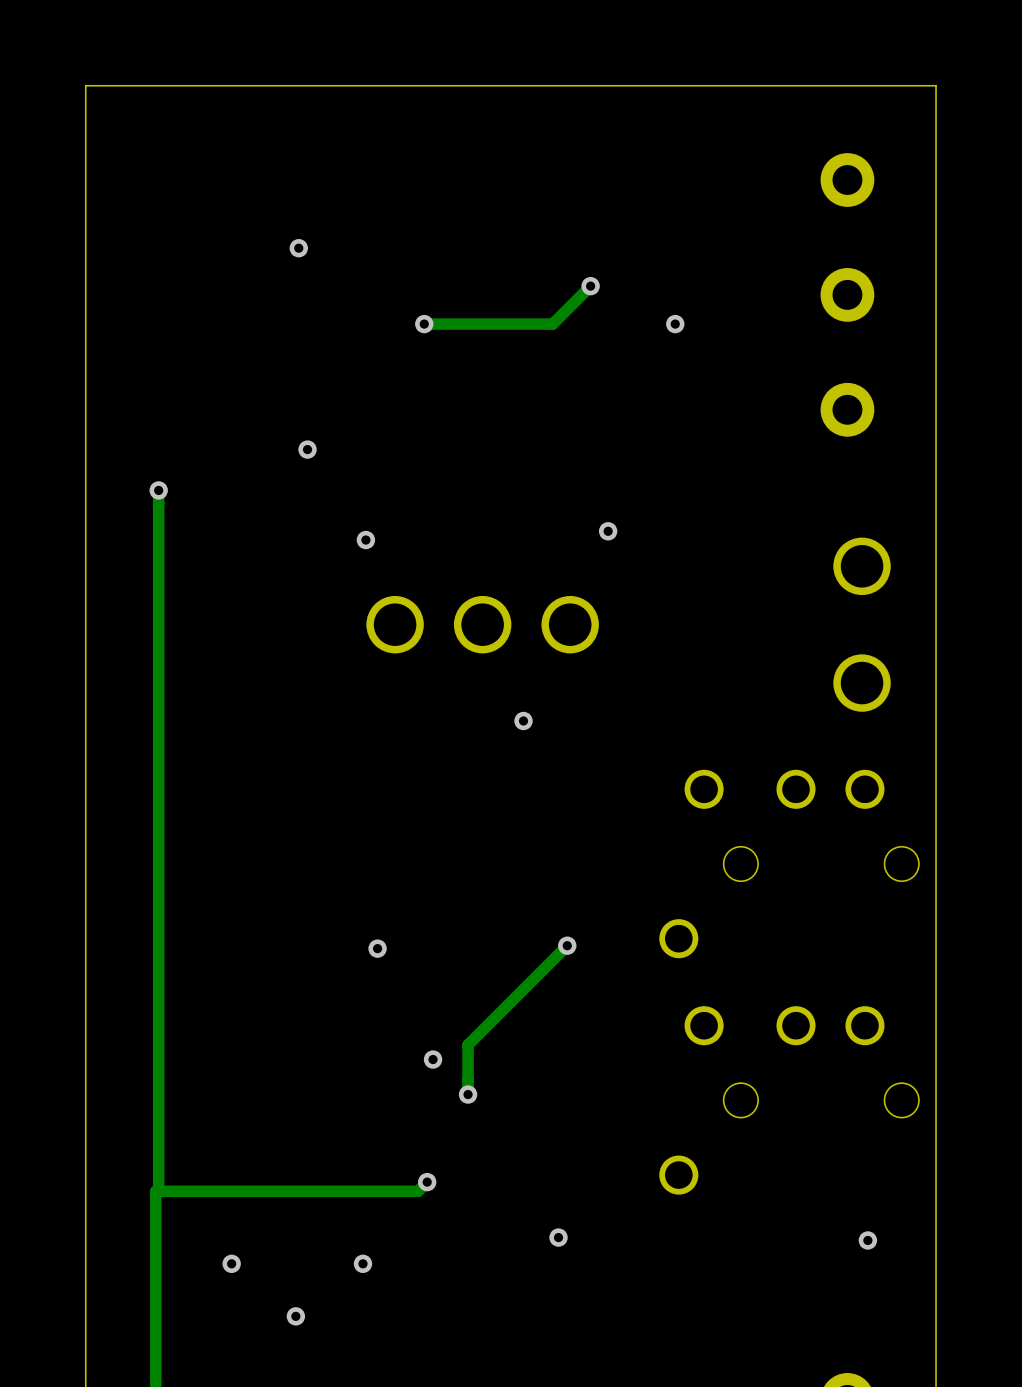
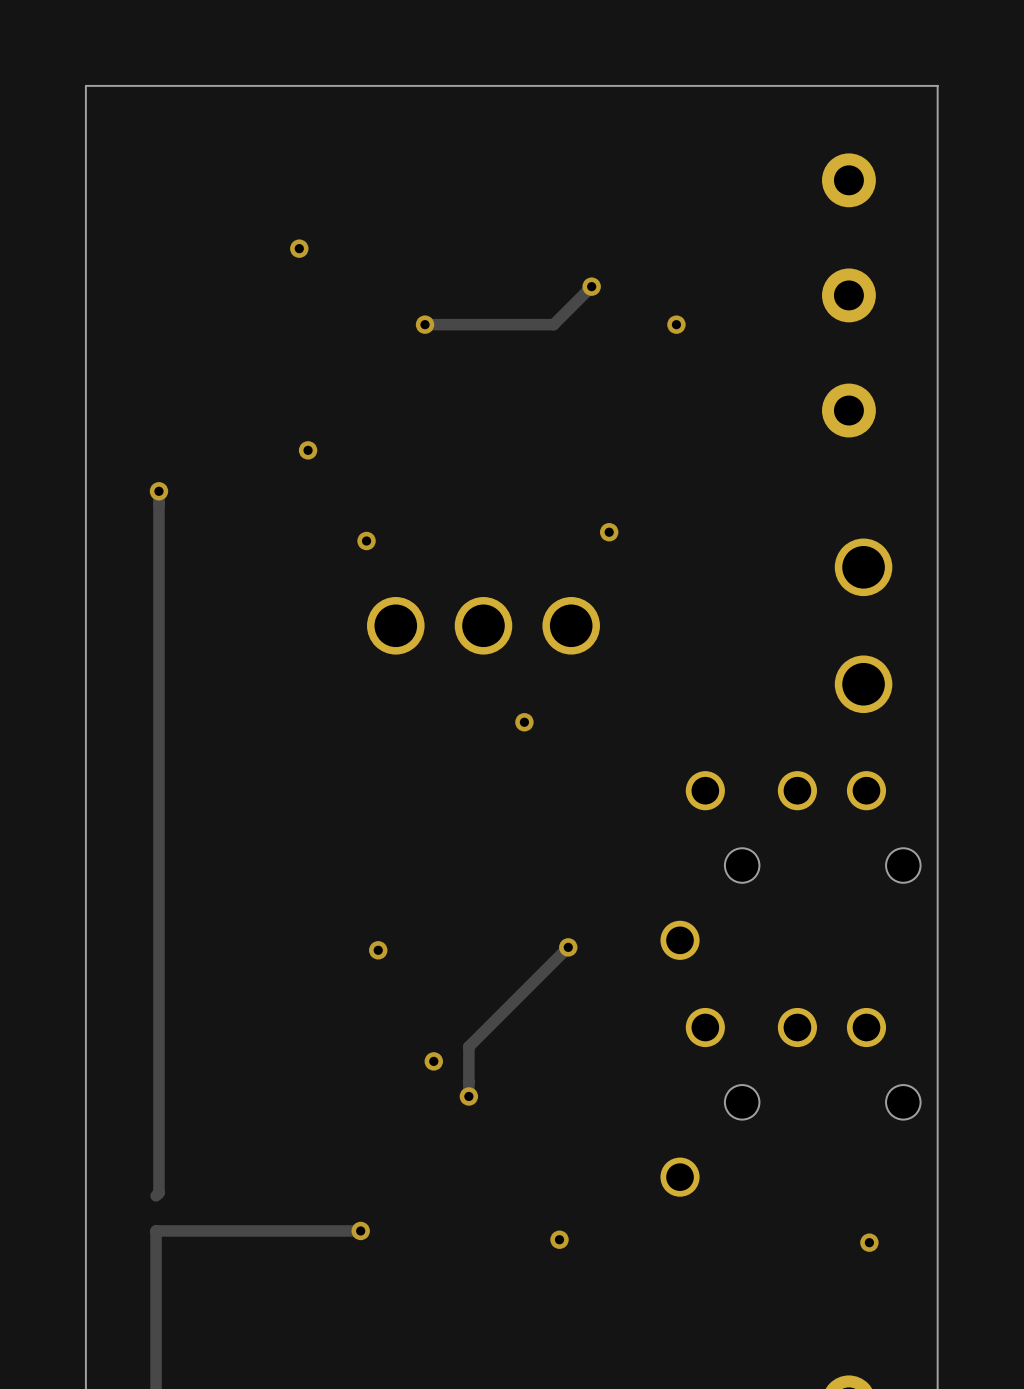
track: (427, 1182) (418, 1191) (155, 1191) (155, 1228) -> (360, 1230) (156, 1230)
via: (427, 1182) -> none
via: (231, 1263) -> none
via position: (362, 1263) -> (360, 1230)
via: (295, 1316) -> none

